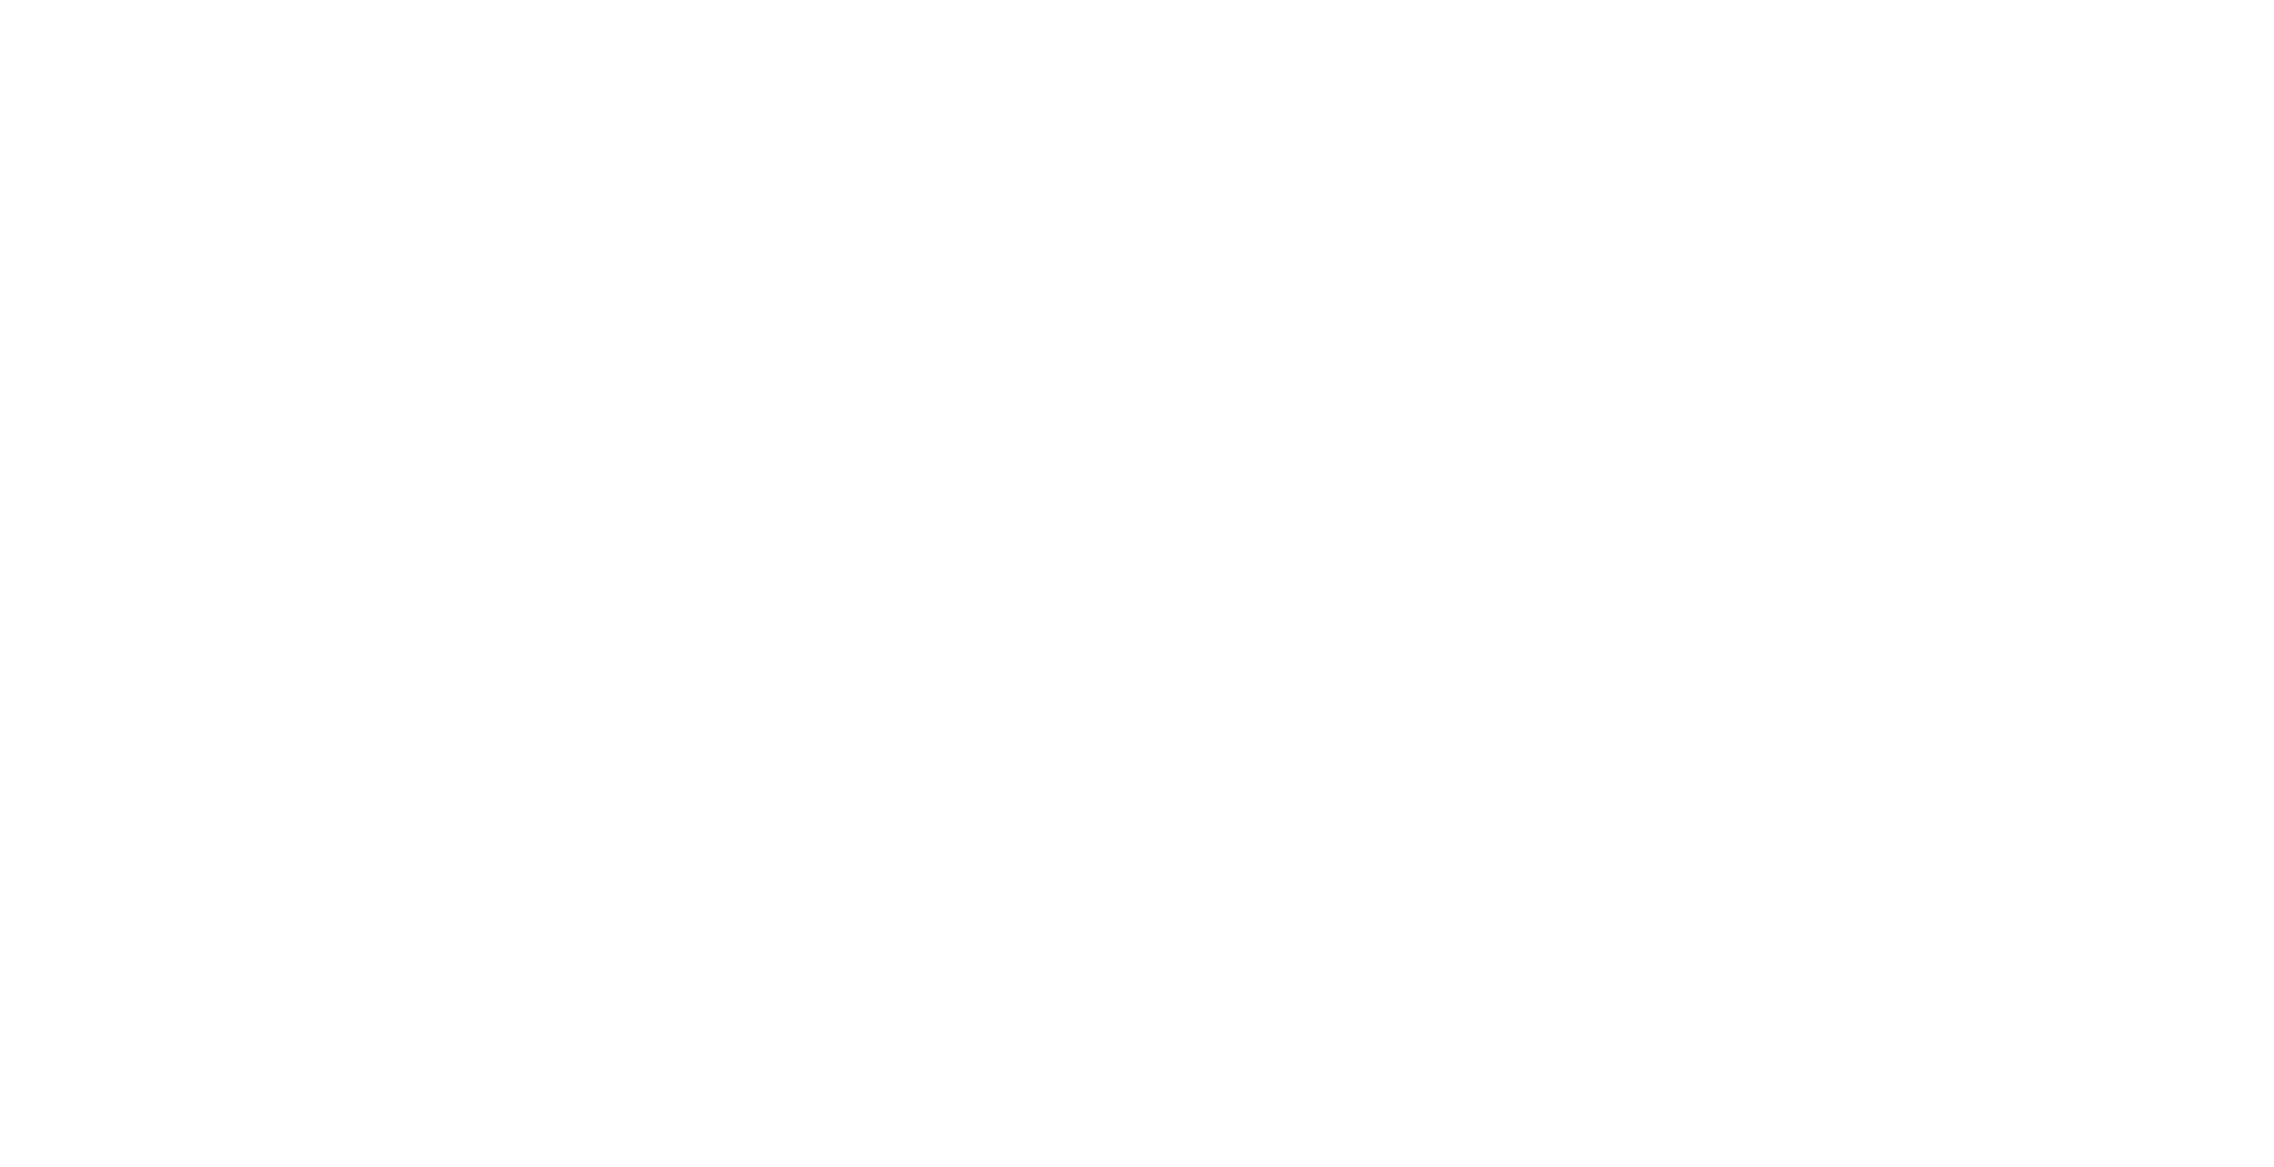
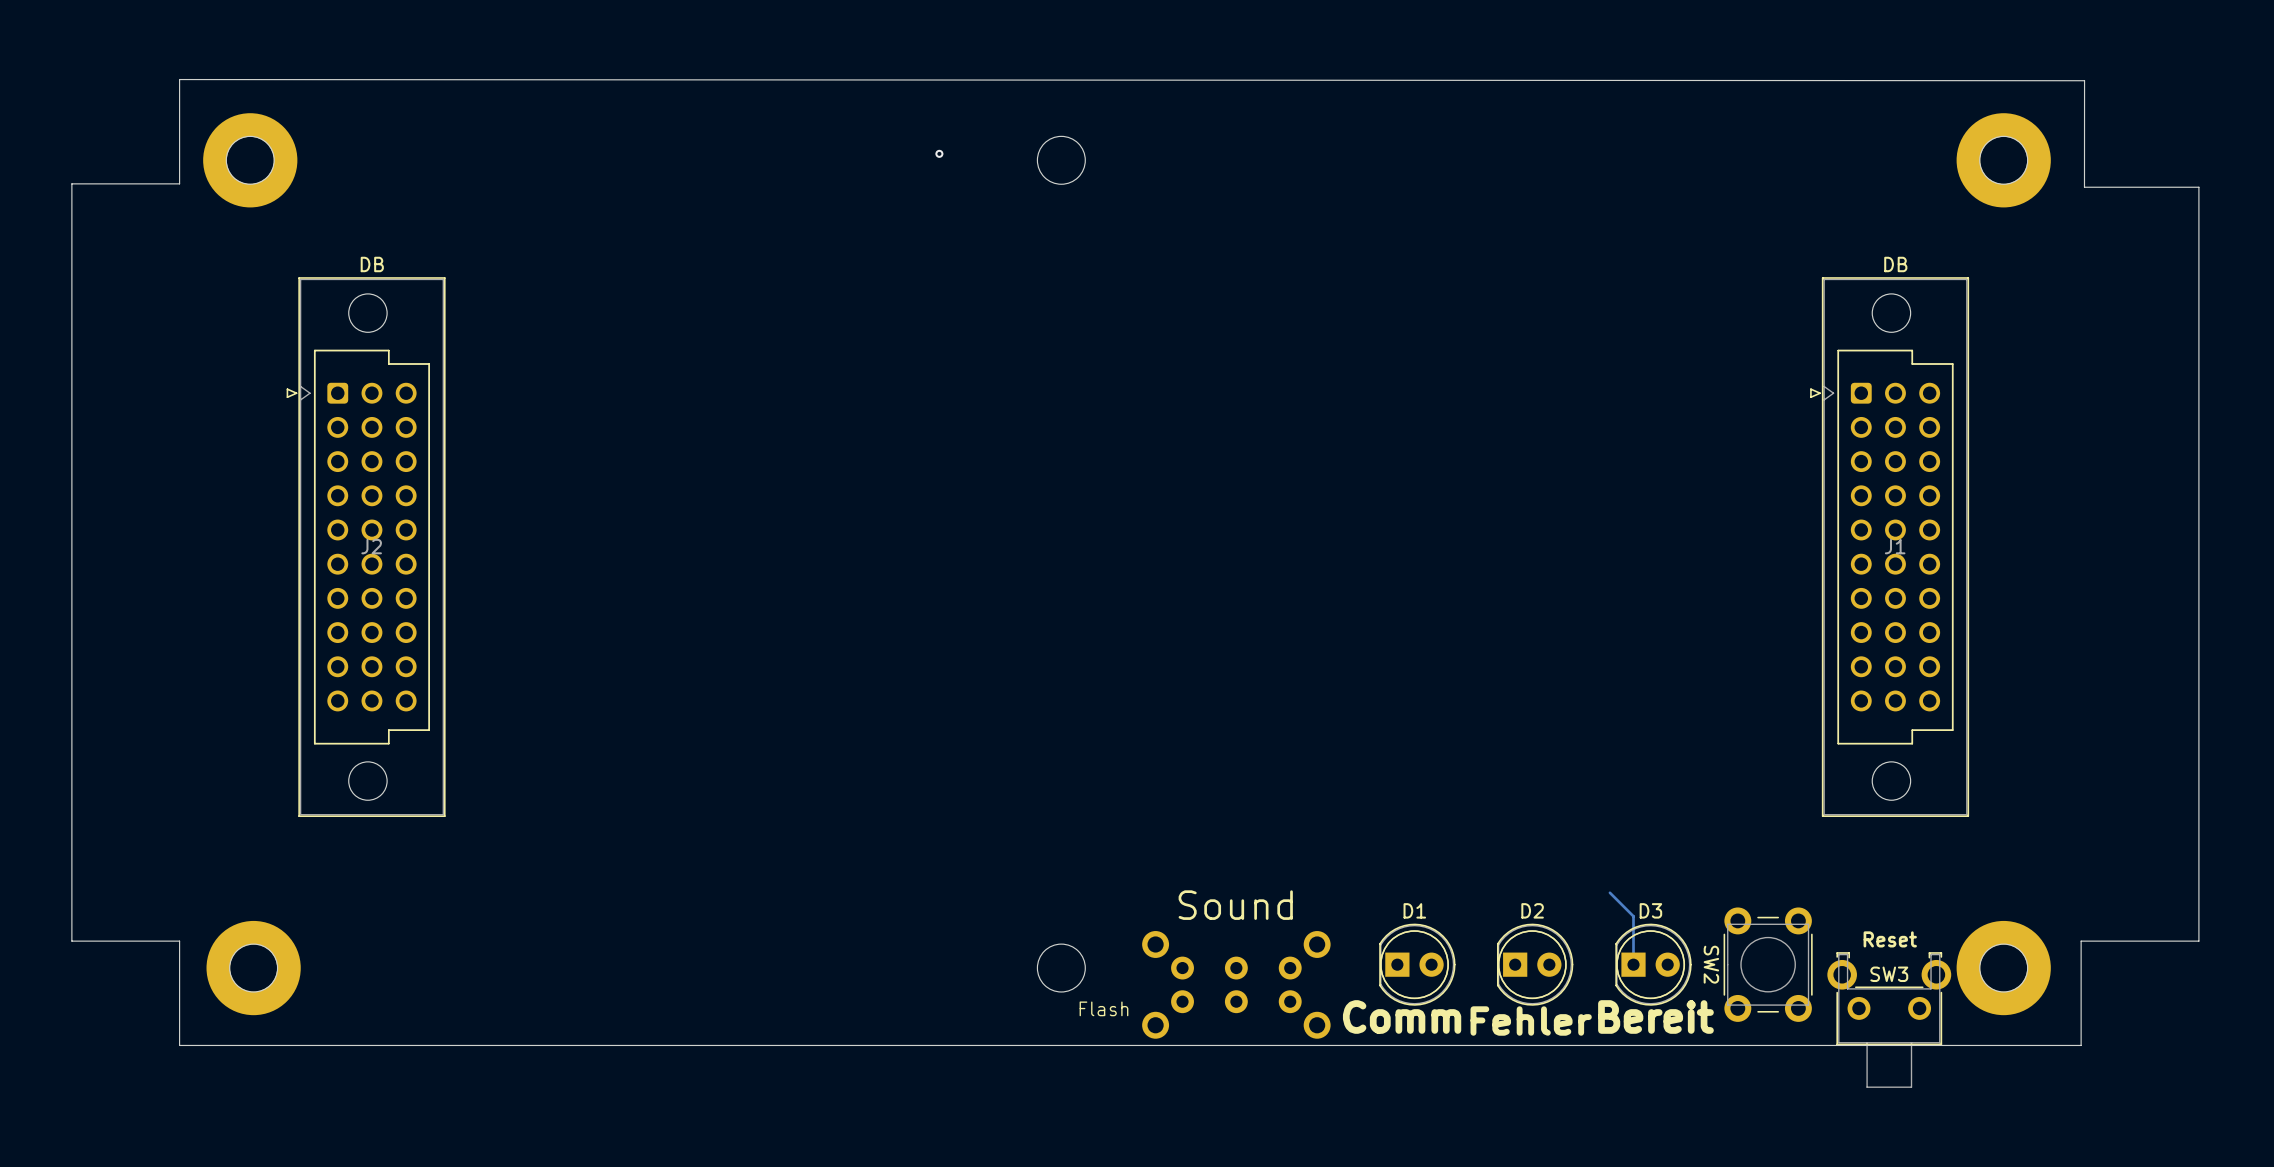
board edge: none -> (179, 79) (2084, 80) (2084, 187) (2198, 187) (2198, 941) (2081, 941) (2081, 1045) (179, 1045) (179, 941) (71, 941) (71, 183) (179, 183) (179, 79)
round board edge: none -> [225, 136, 275, 185]
round board edge: none -> [1037, 136, 1086, 185]
round board edge: none -> [1979, 136, 2028, 185]
via: none -> (939, 153)
part: none -> (250, 160)
part: none -> (2003, 160)
J2: none -> DB (366, 547)
J1: none -> DB (1889, 547)
track: none -> (1609, 892) (1633, 916) (1633, 964)
round board edge: none -> [229, 943, 278, 993]
round board edge: none -> [1037, 943, 1086, 993]
round board edge: none -> [1979, 943, 2028, 993]
D1: none -> Comm (1417, 964)
D2: none -> Fehler (1535, 964)
D3: none -> Bereit (1653, 964)
SW2: none -> (1768, 964)
part: none -> (253, 968)
part: none -> (2003, 968)
part: none -> Sound (1236, 984)
text: none -> Flash (1103, 1008)
SW3: none -> Reset (1889, 1020)

